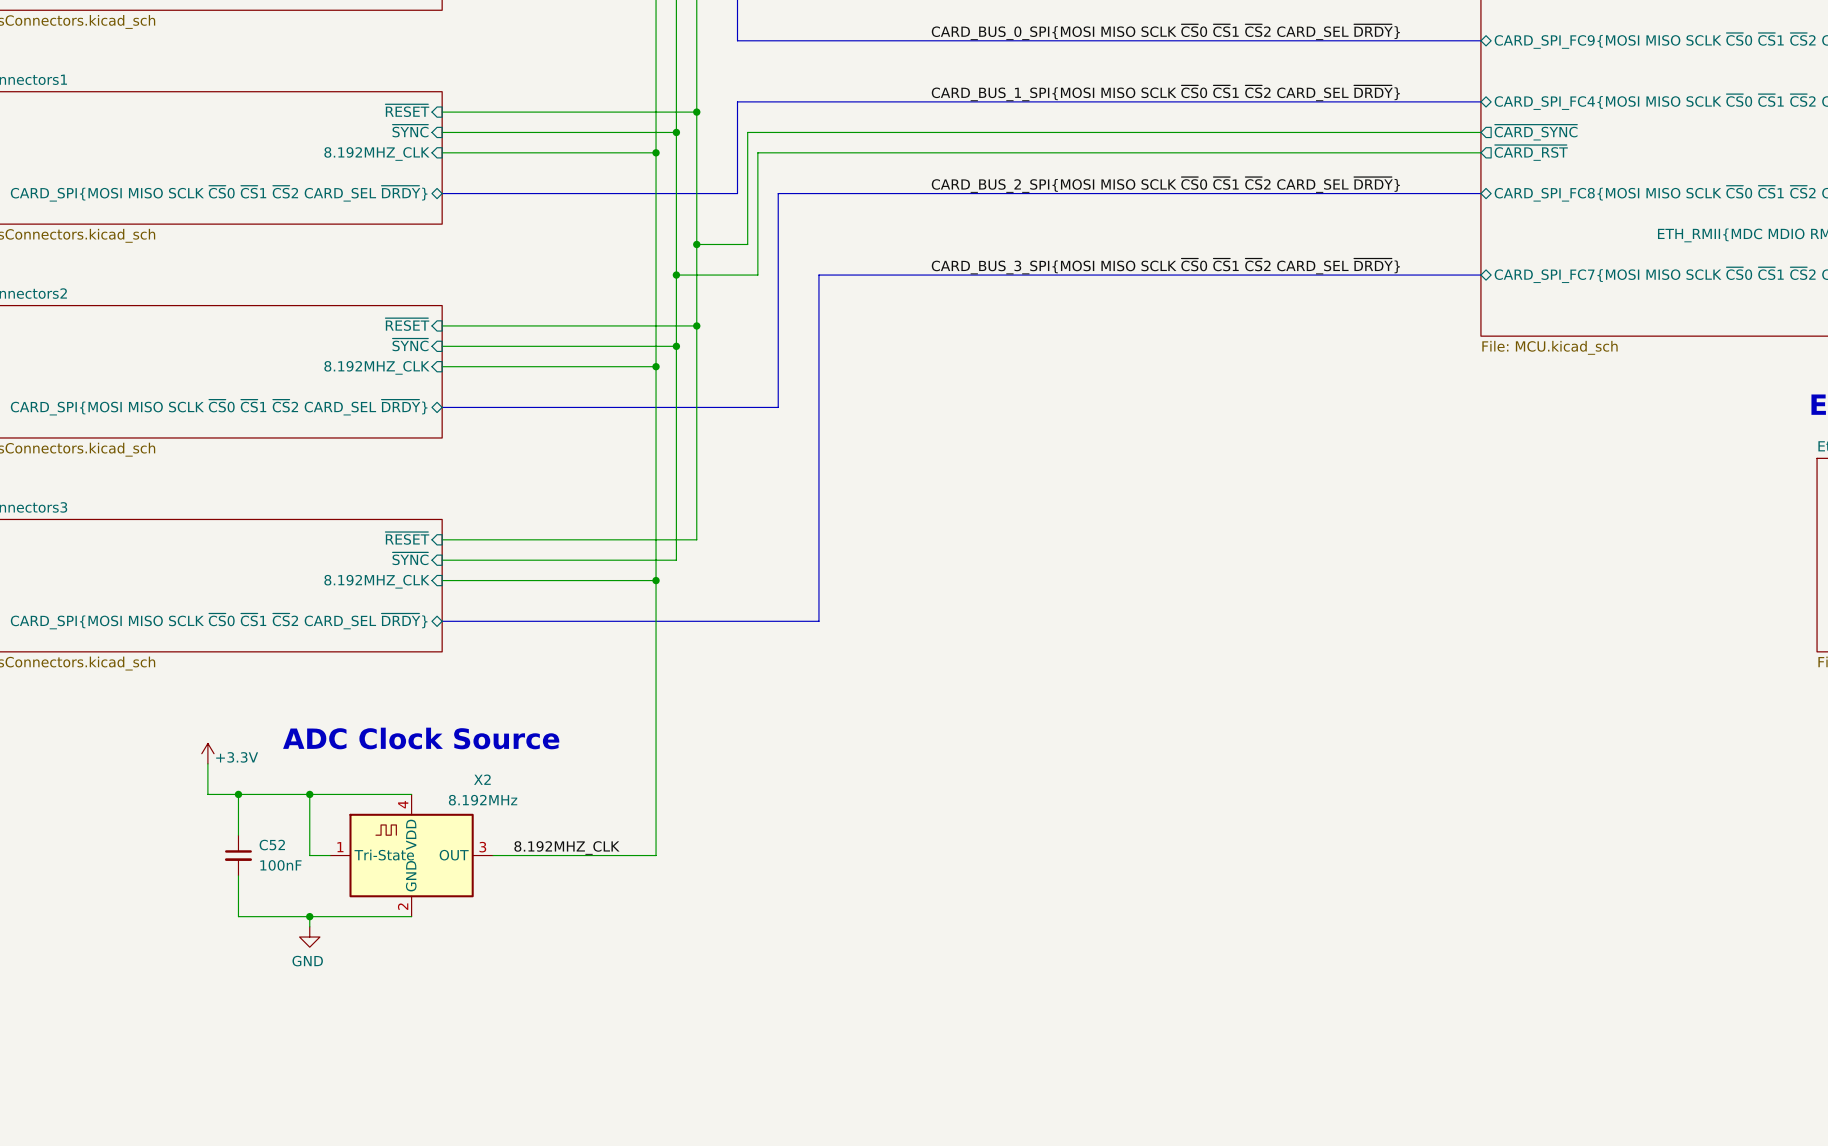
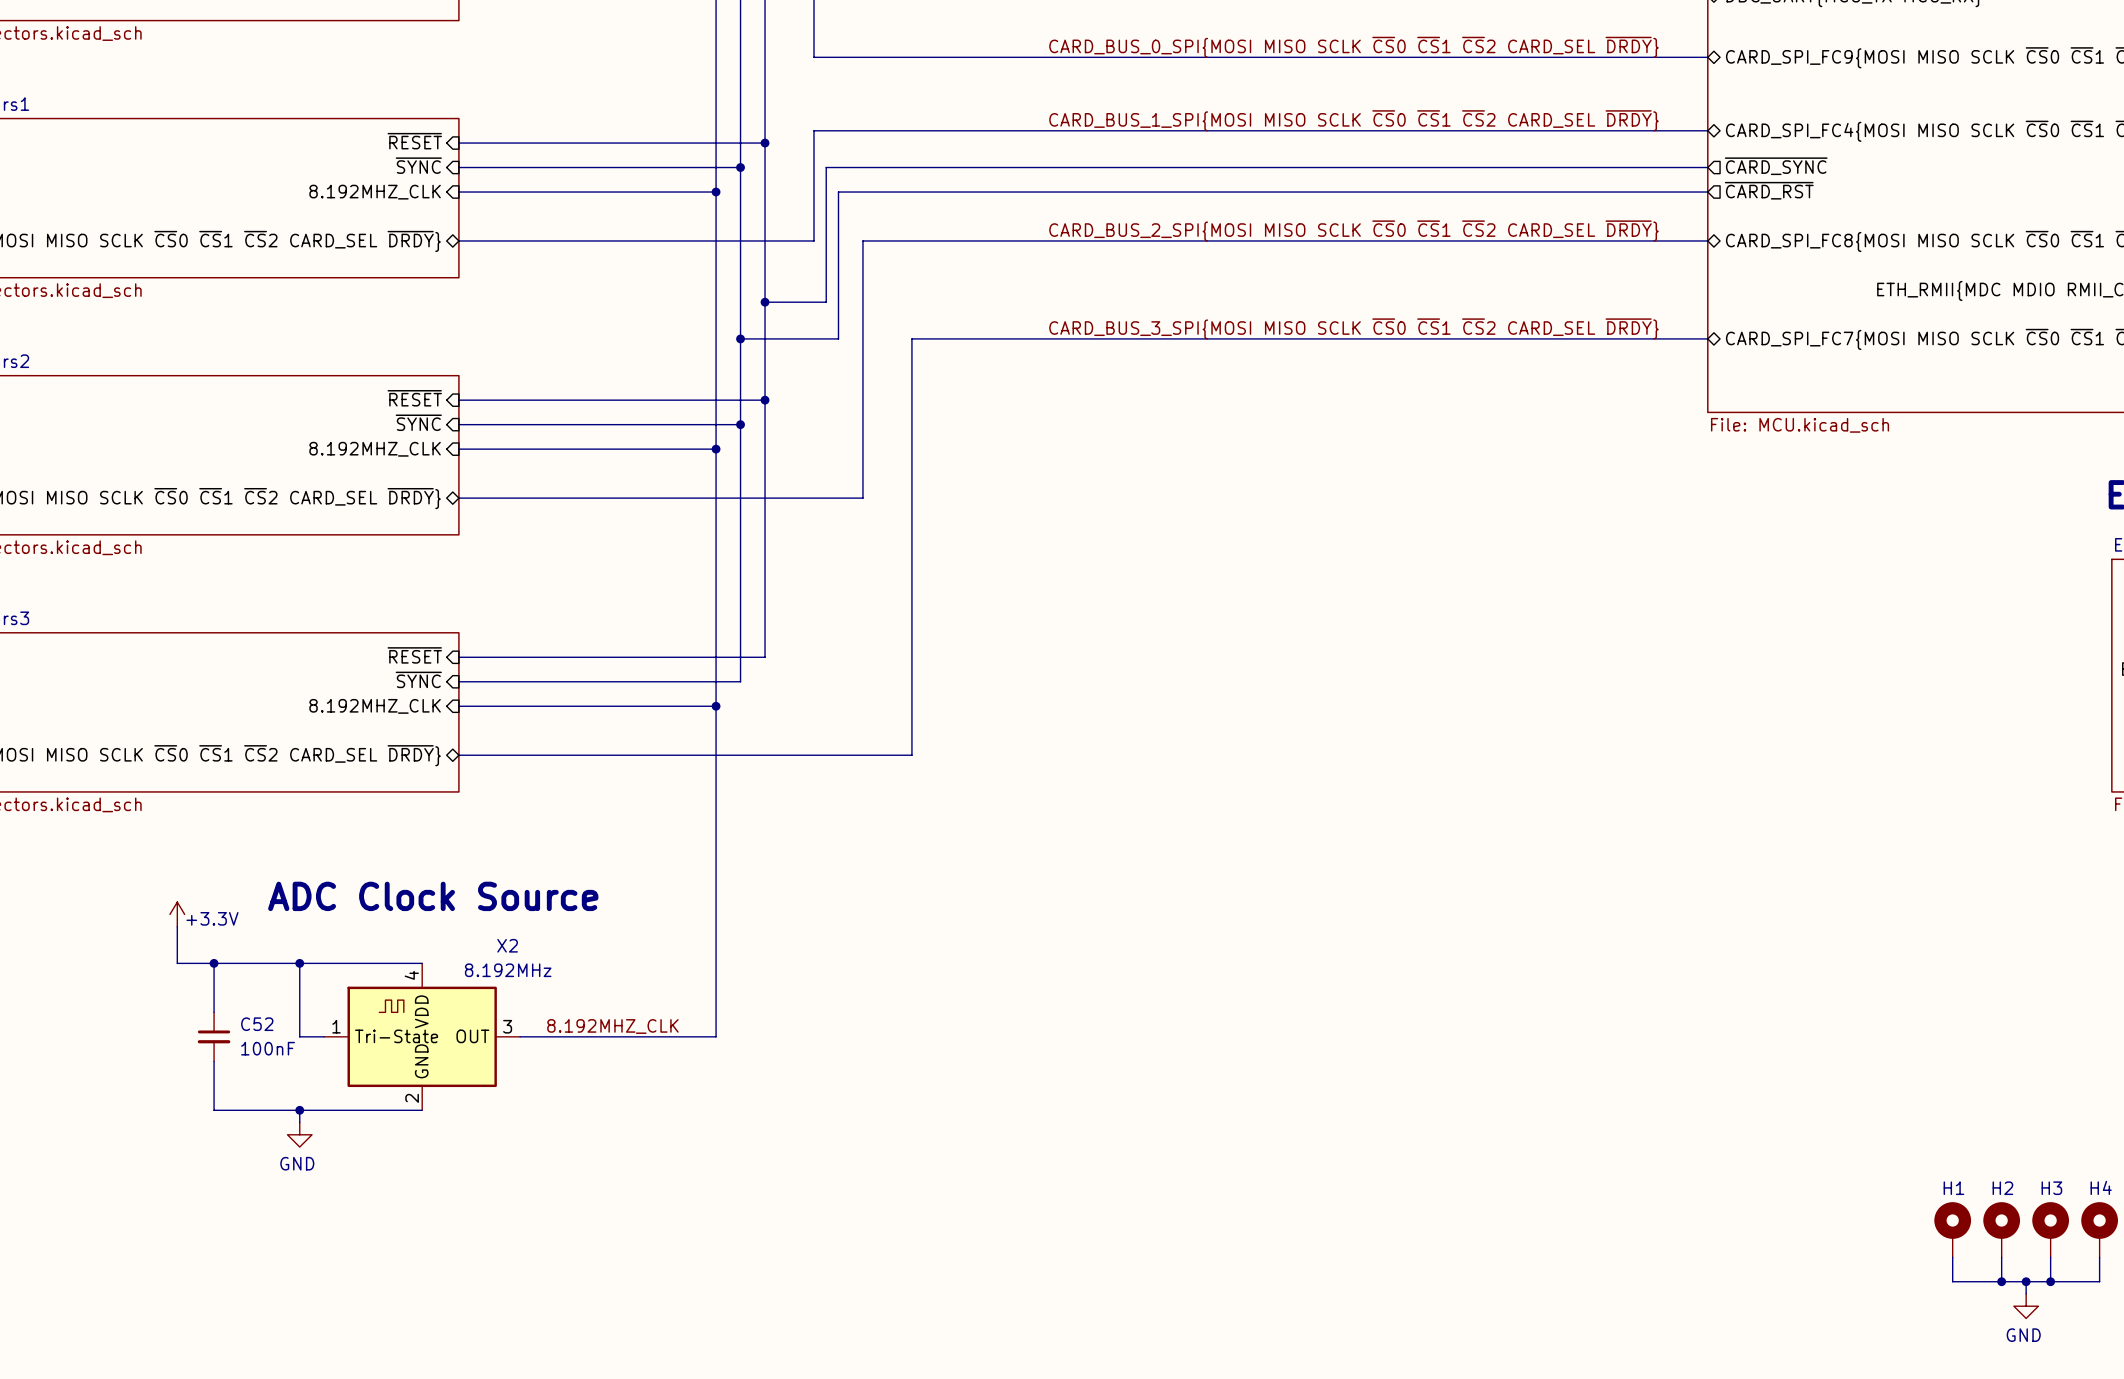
H1: none -> (1952, 1229)
H2: none -> (2001, 1229)
H3: none -> (2050, 1229)
H4: none -> (2099, 1229)
wire: none -> (1952, 1257) (1952, 1281) (2099, 1281) (2099, 1257)
wire: none -> (2001, 1257) (2001, 1281)
wire: none -> (2050, 1257) (2050, 1281)
junction: none -> (2001, 1281)
wire: none -> (2026, 1281) (2026, 1293)
junction: none -> (2026, 1281)
junction: none -> (2050, 1281)
power symbol: none -> GND (2026, 1306)

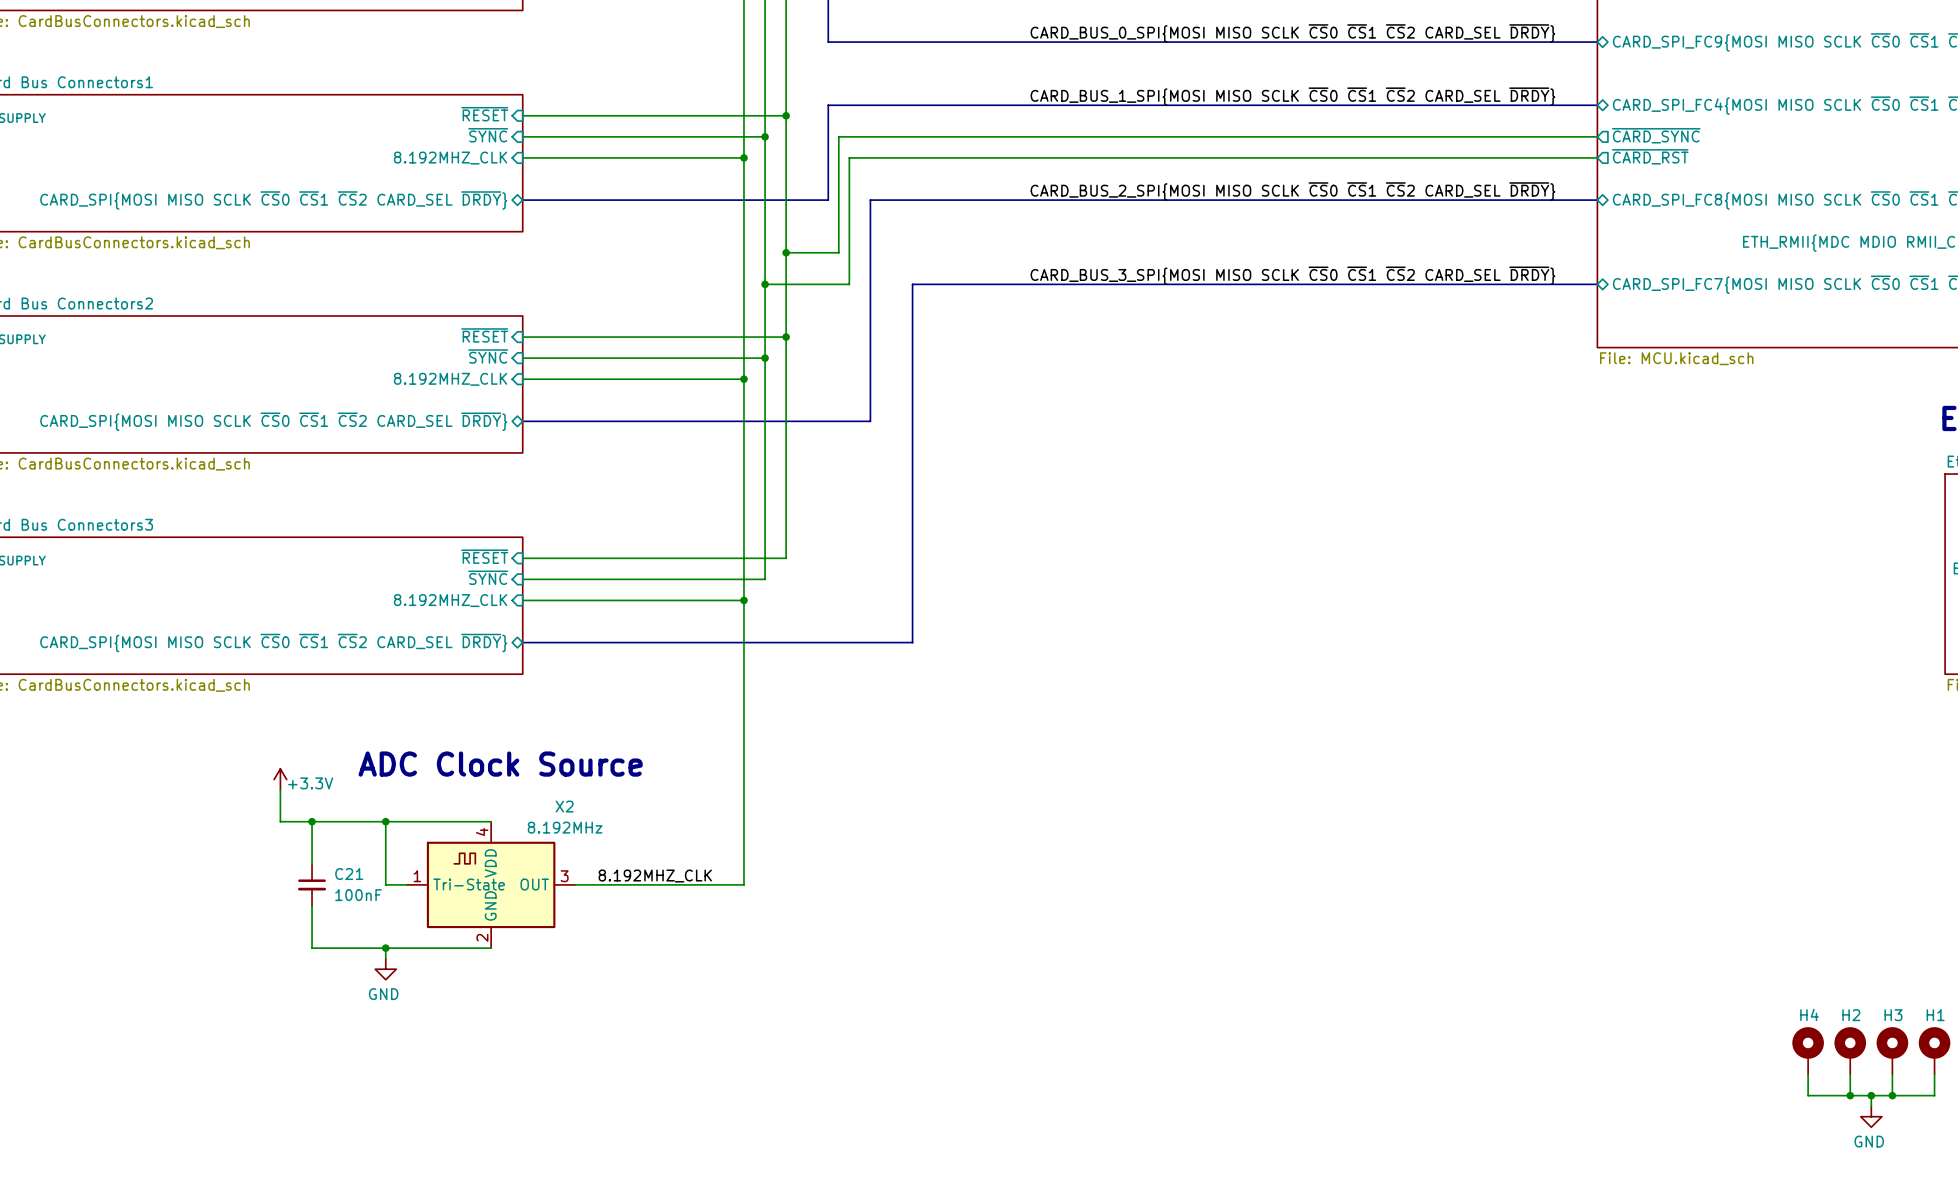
C52 name: C52 (257, 1024) -> C21 (349, 874)
H4 name: H4 (2101, 1187) -> H1 (1935, 1015)
H1 name: H1 (1953, 1188) -> H4 (1809, 1014)

